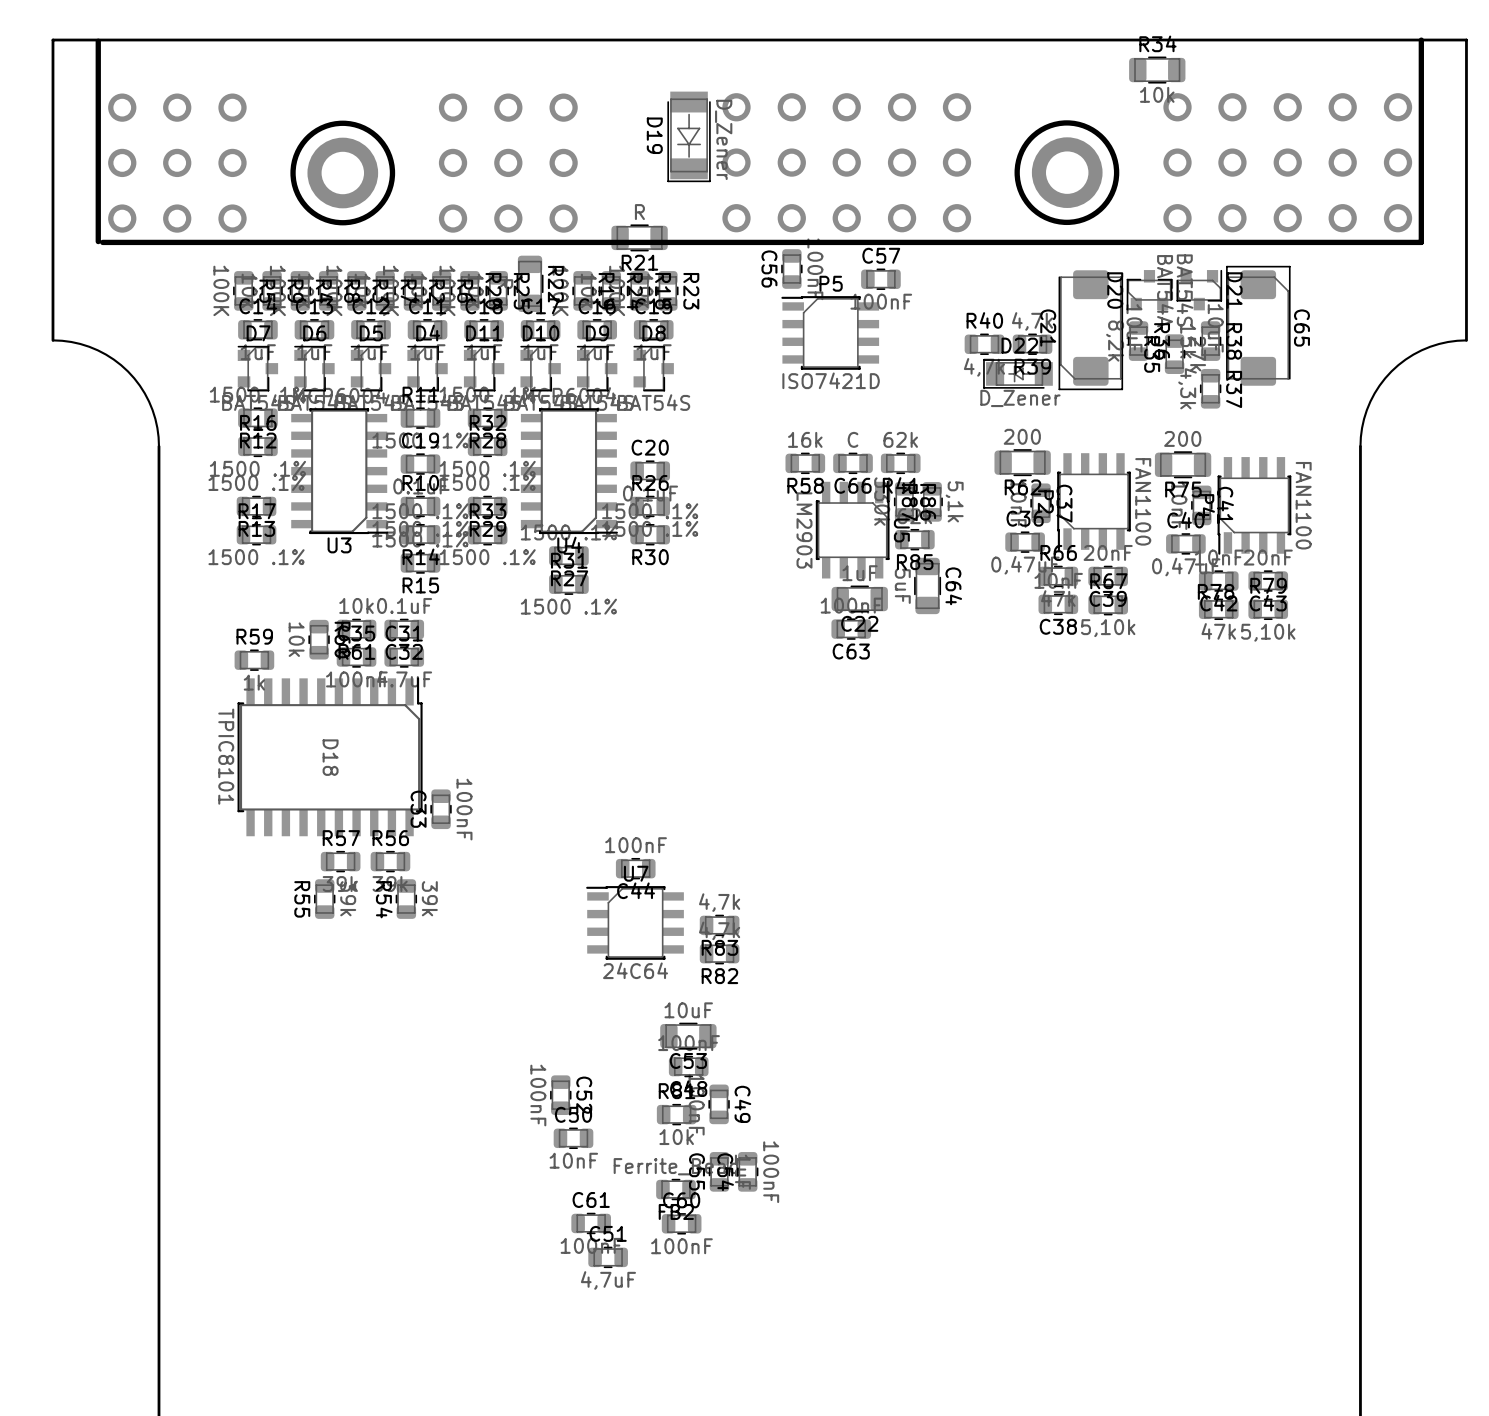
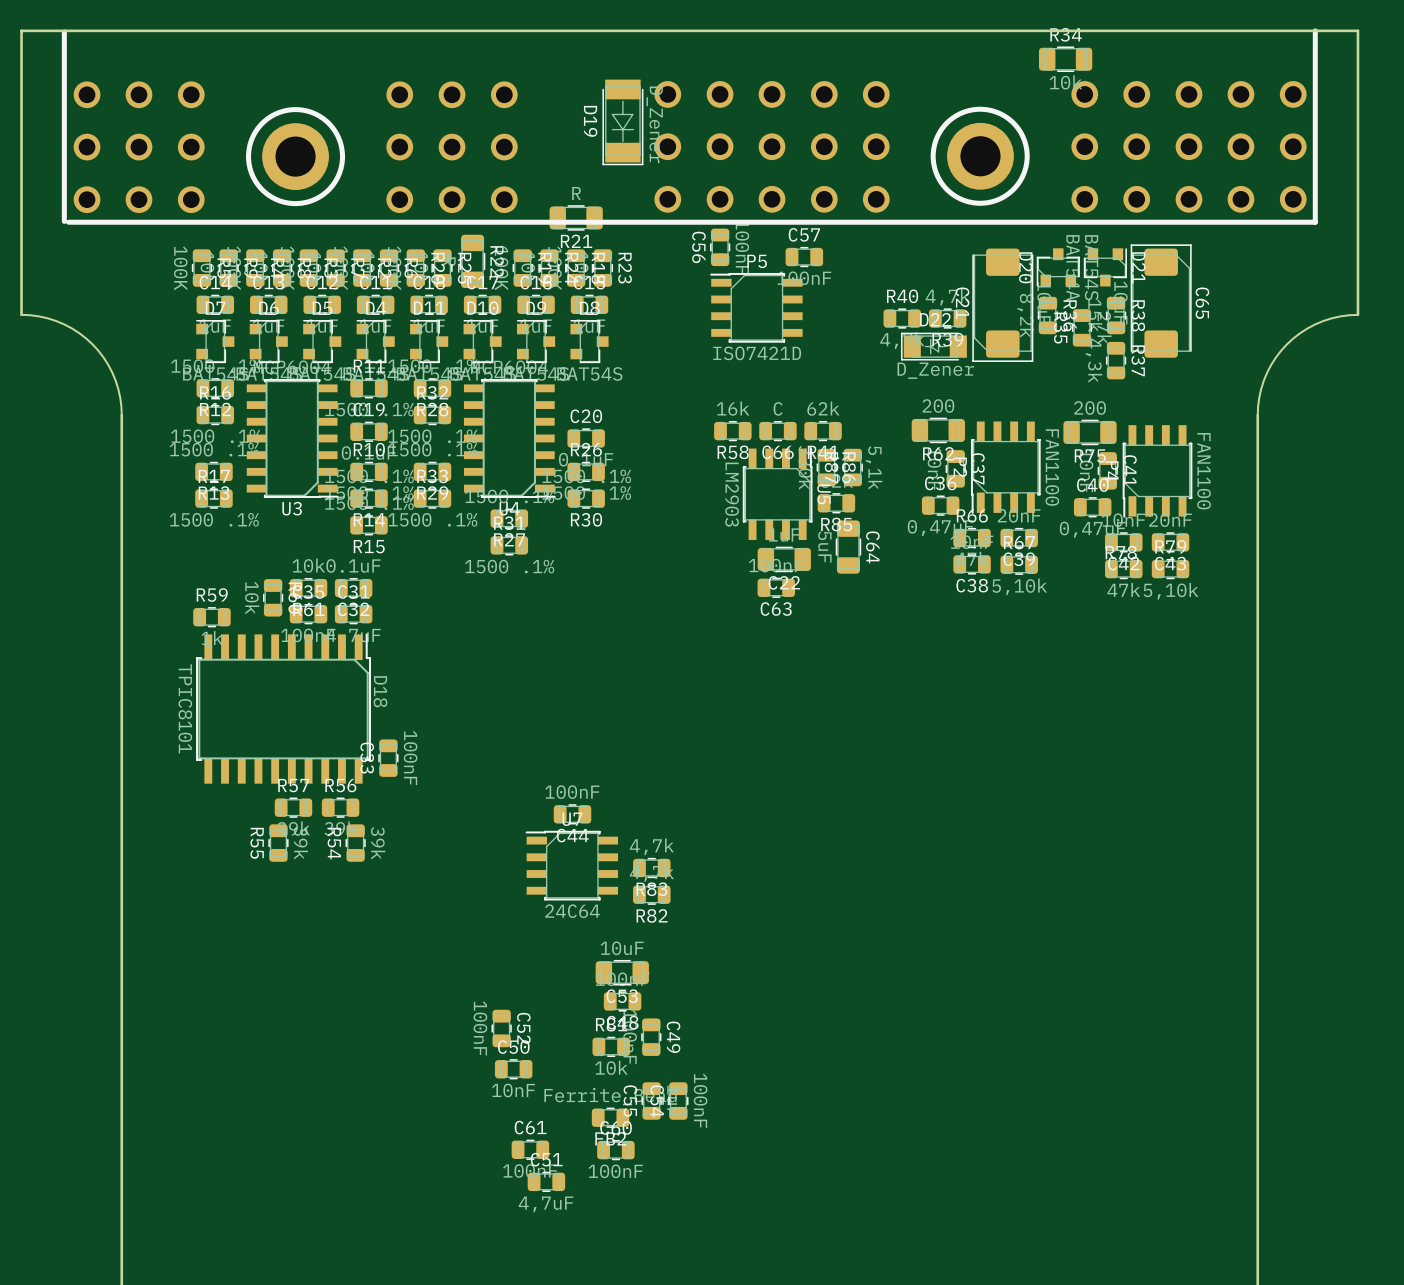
D18 name position: D18 (330, 757) -> D18 (380, 691)

